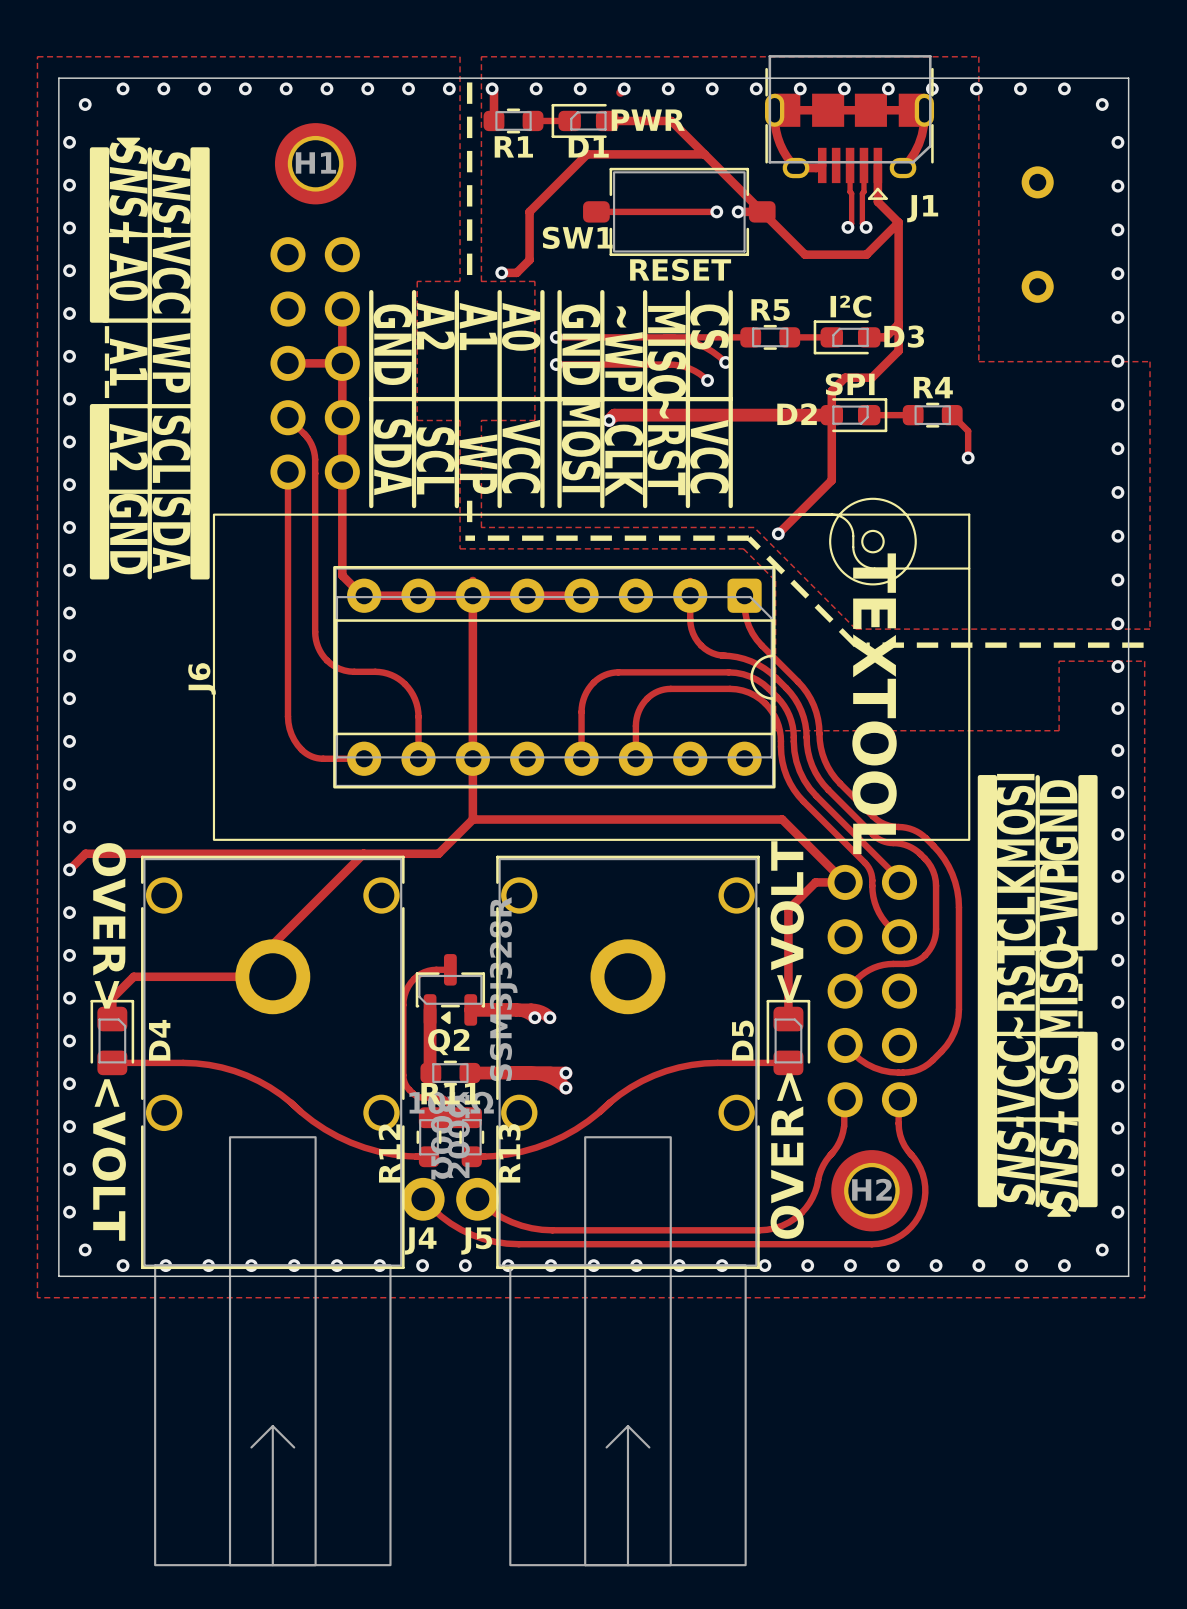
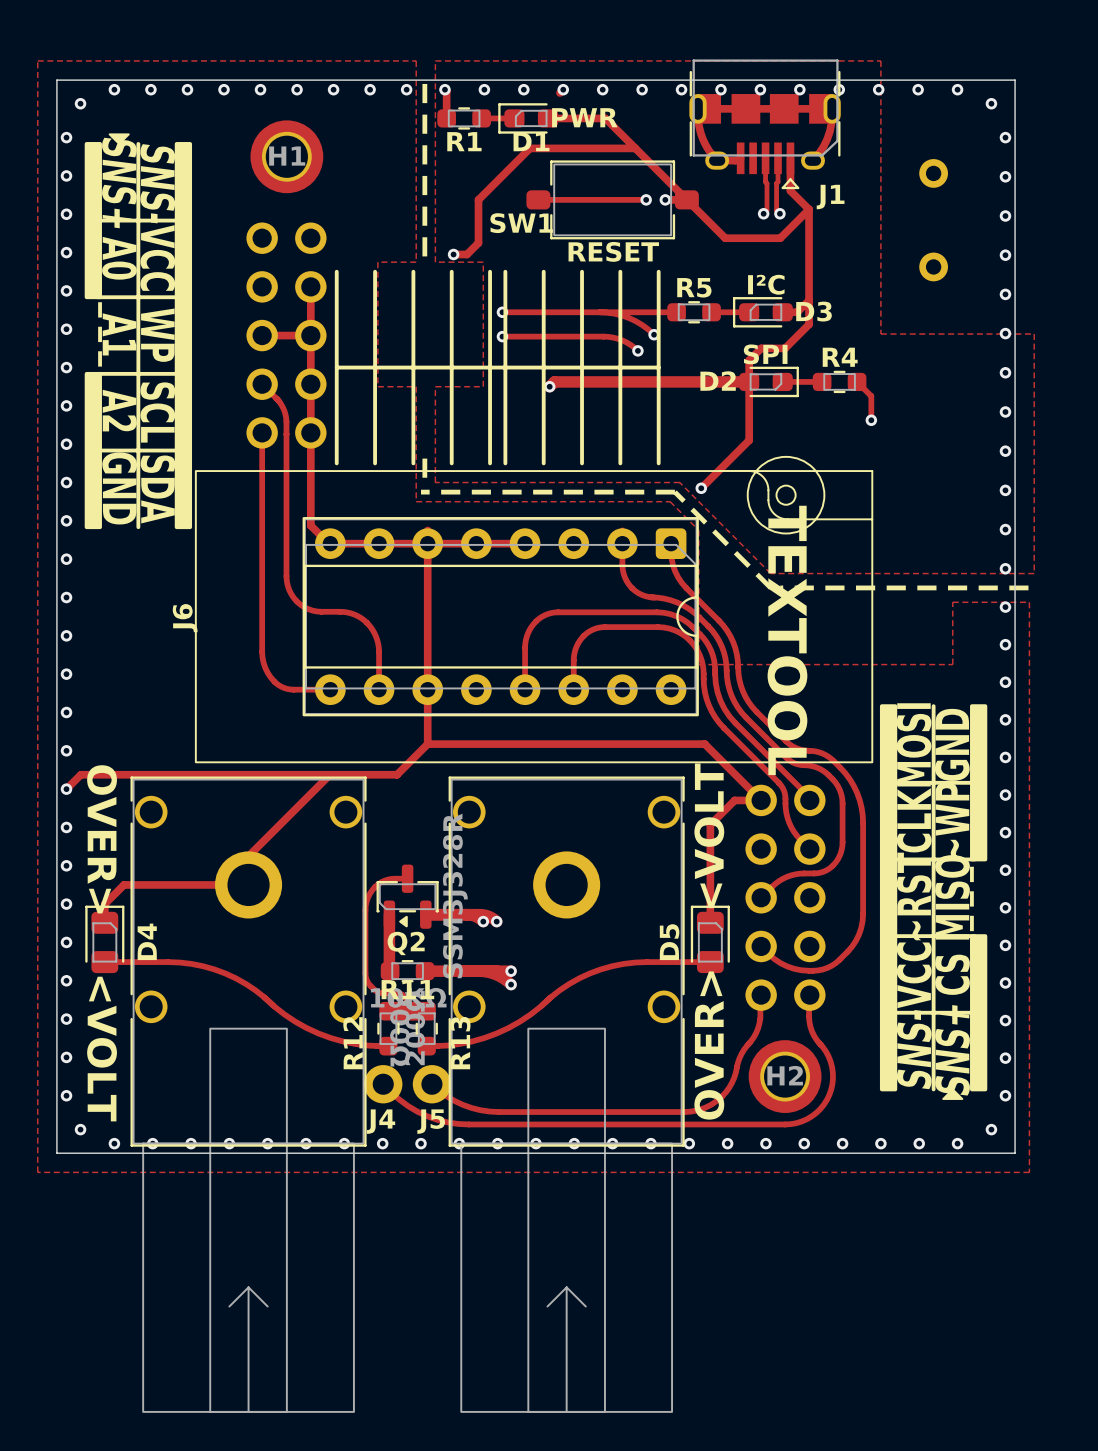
text: A2 (436, 326) -> none
text: A1 (478, 326) -> none
text: A0 (521, 326) -> none
text: CS (709, 326) -> none
text: GND (392, 344) -> none
text: GND (581, 344) -> none
text: ~WP (624, 349) -> none
text: MISO (666, 353) -> none
text: MOSI (581, 445) -> none
text: ~RST (666, 446) -> none
text: VCC (521, 456) -> none
text: VCC (709, 456) -> none
text: SDA (392, 457) -> none
text: SCL (435, 460) -> none
text: CLK (624, 460) -> none
text: WP (478, 464) -> none

